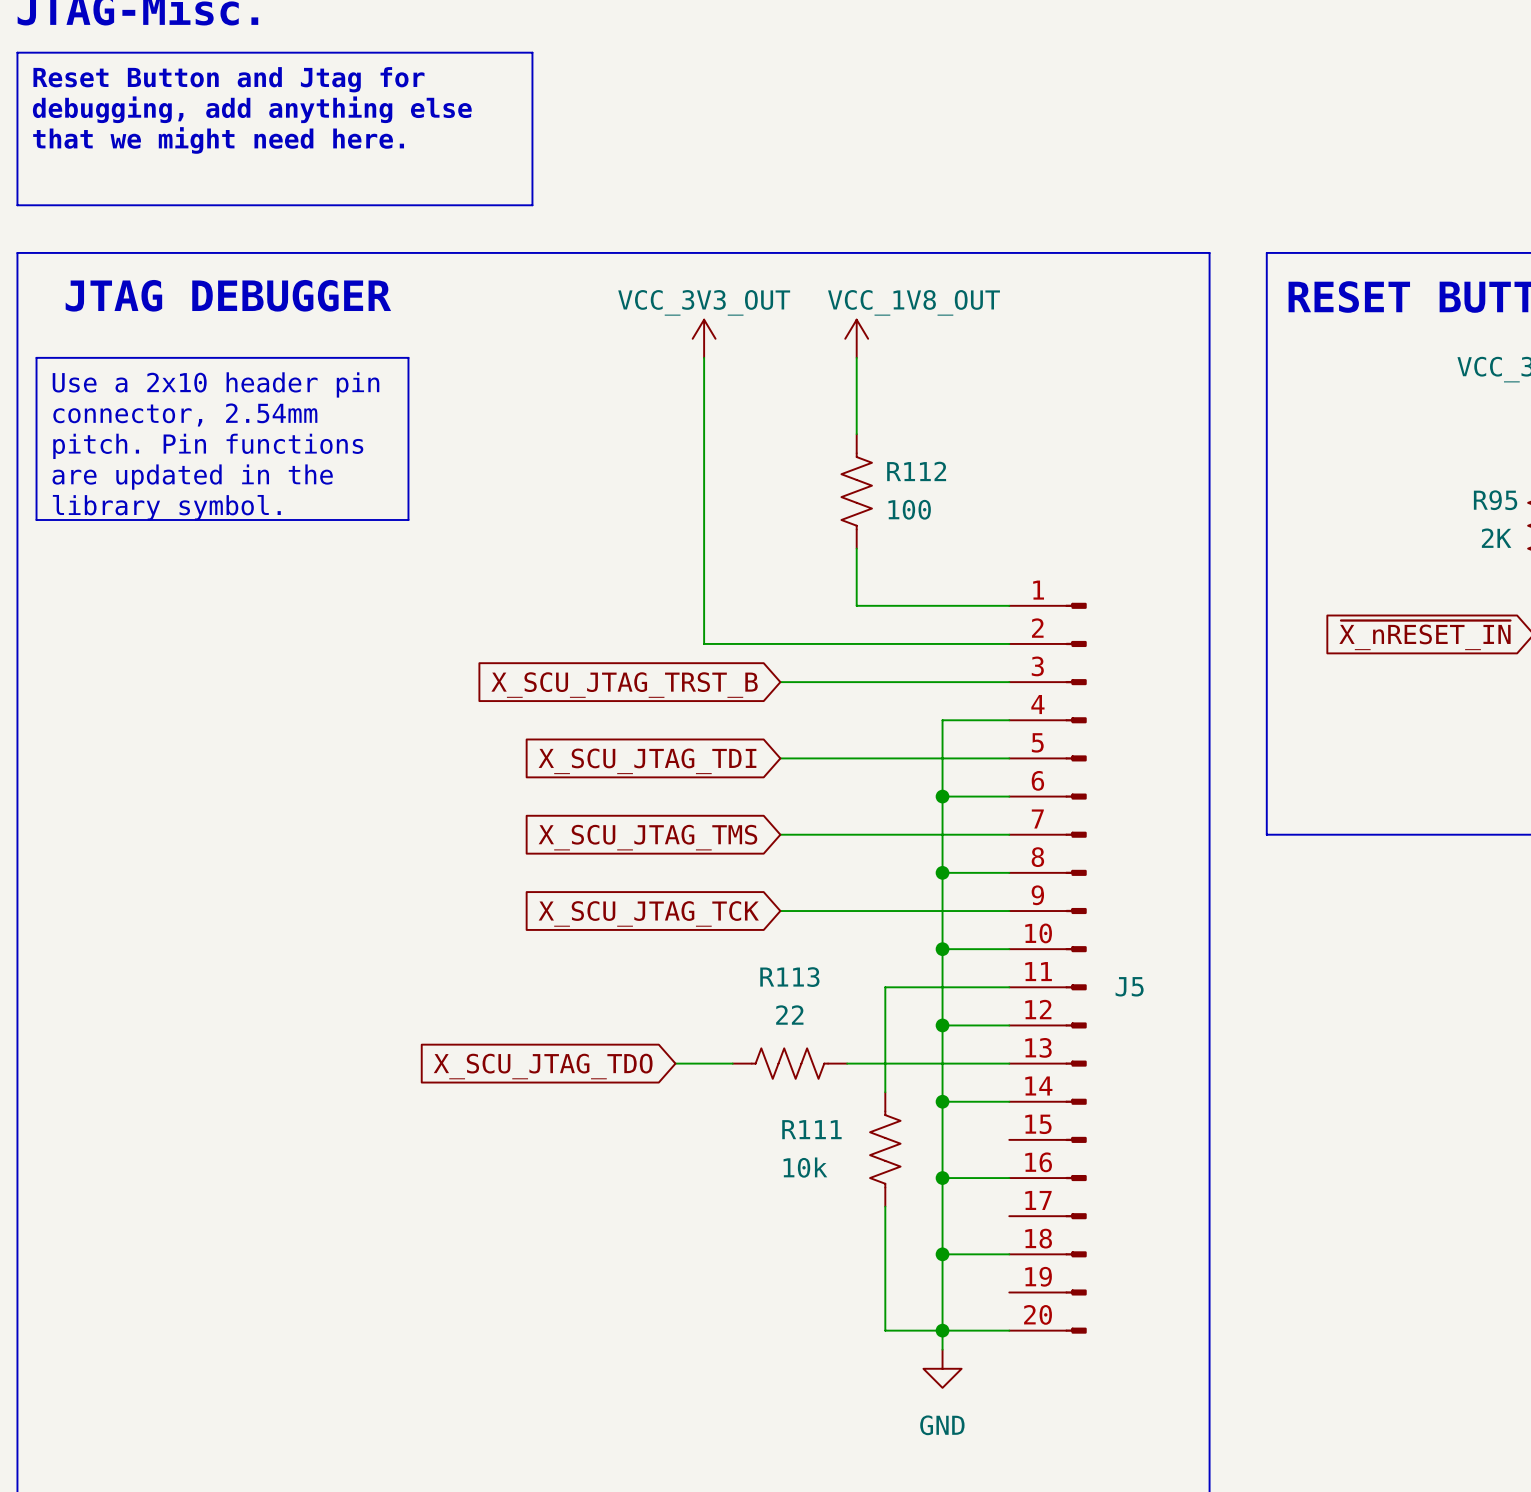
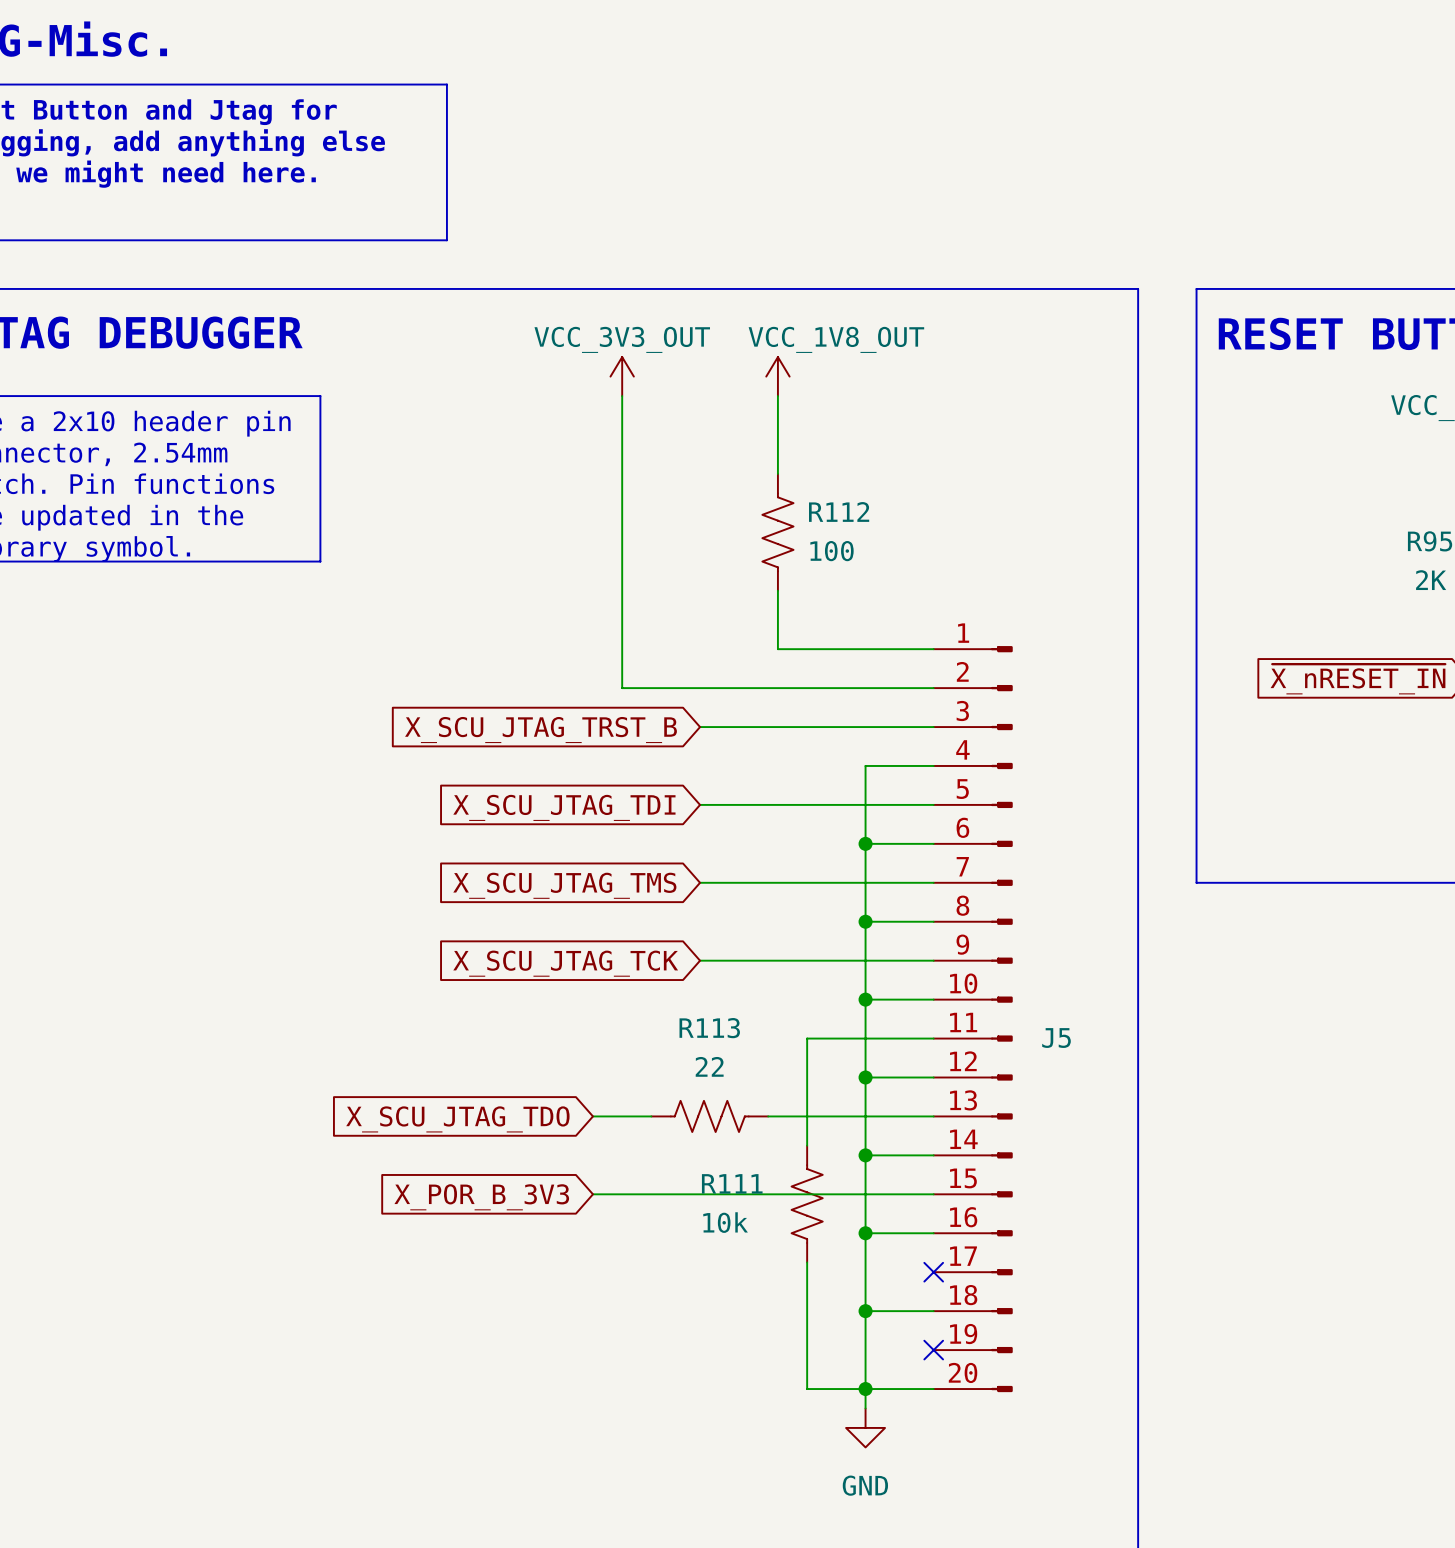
wire: none -> (592, 1194) (933, 1194)
global label: none -> X_POR_B_3V3 (481, 1197)
no-connect mark: none -> (933, 1272)
no-connect mark: none -> (933, 1350)

